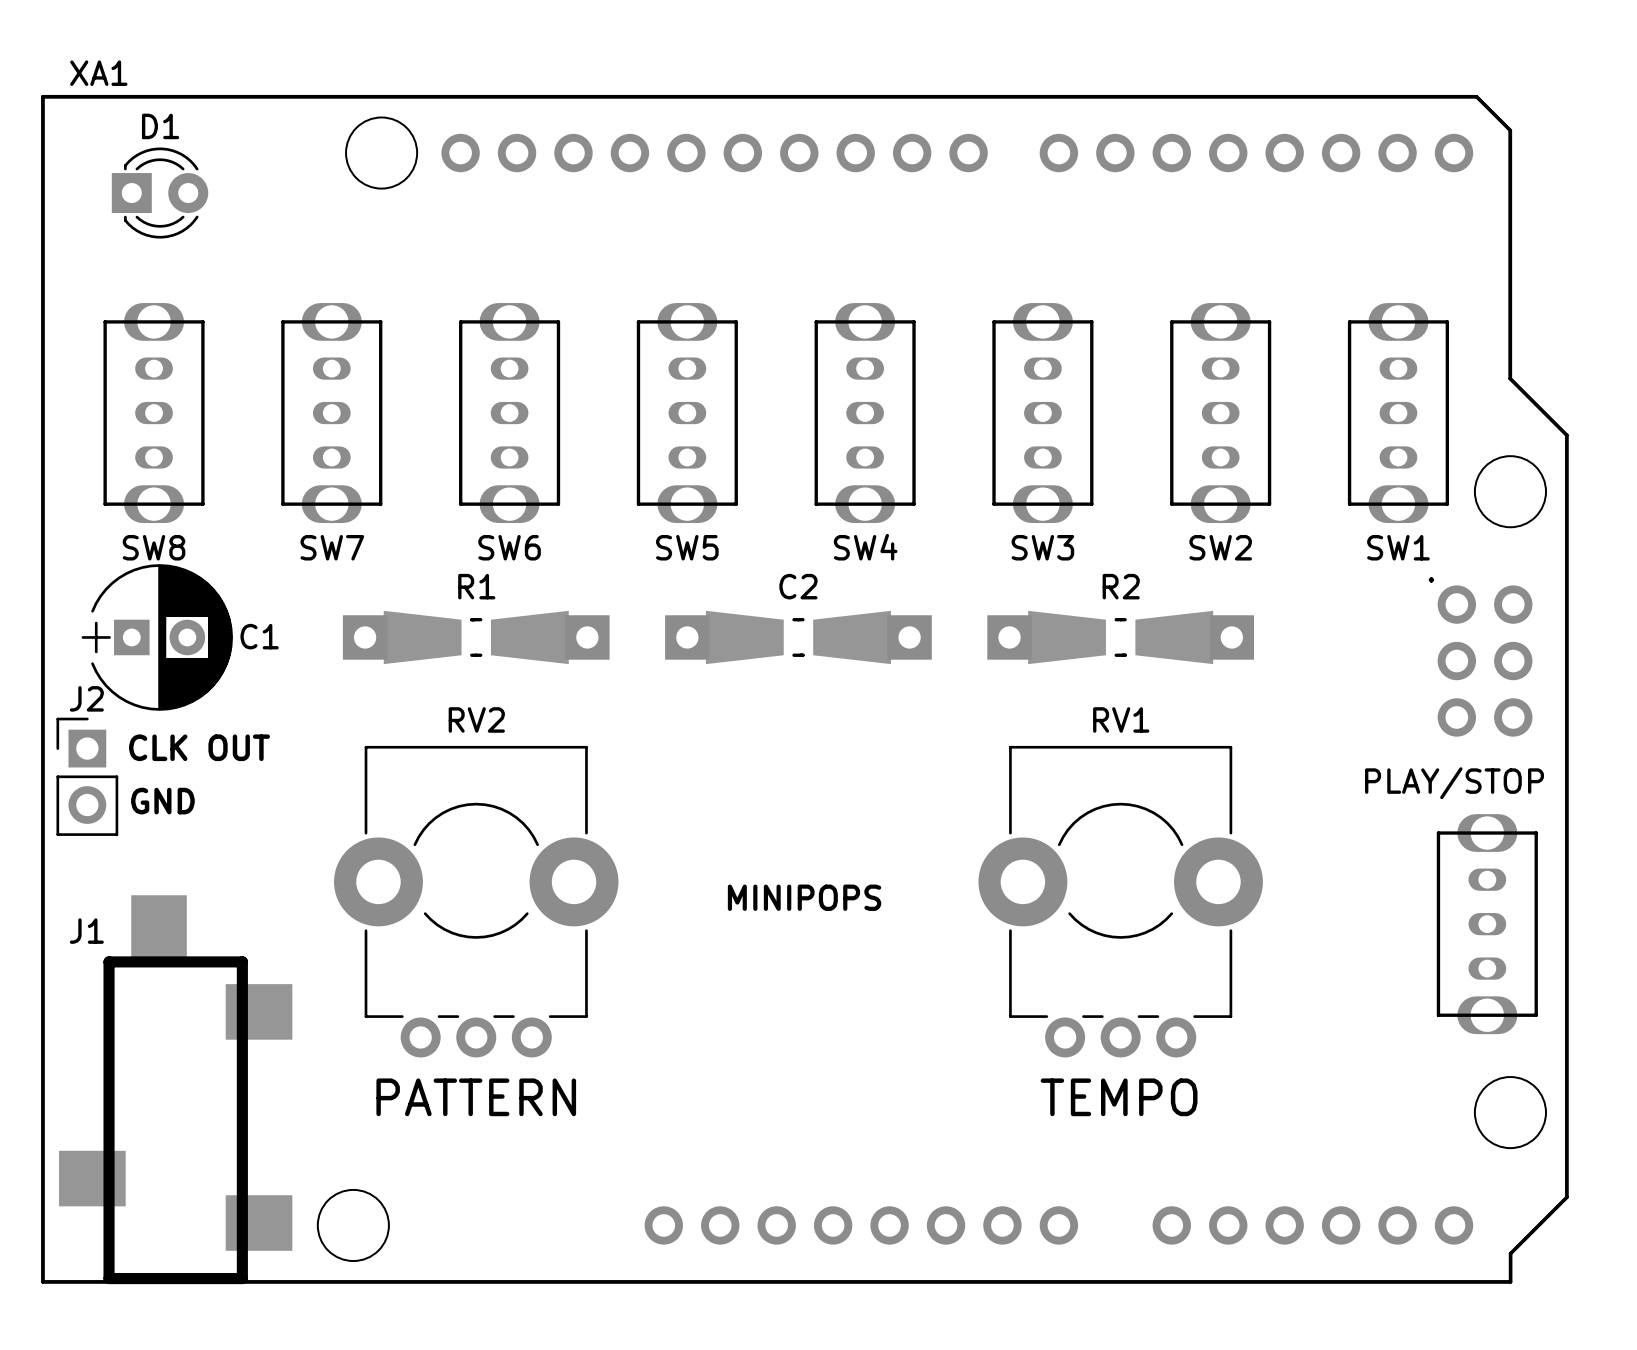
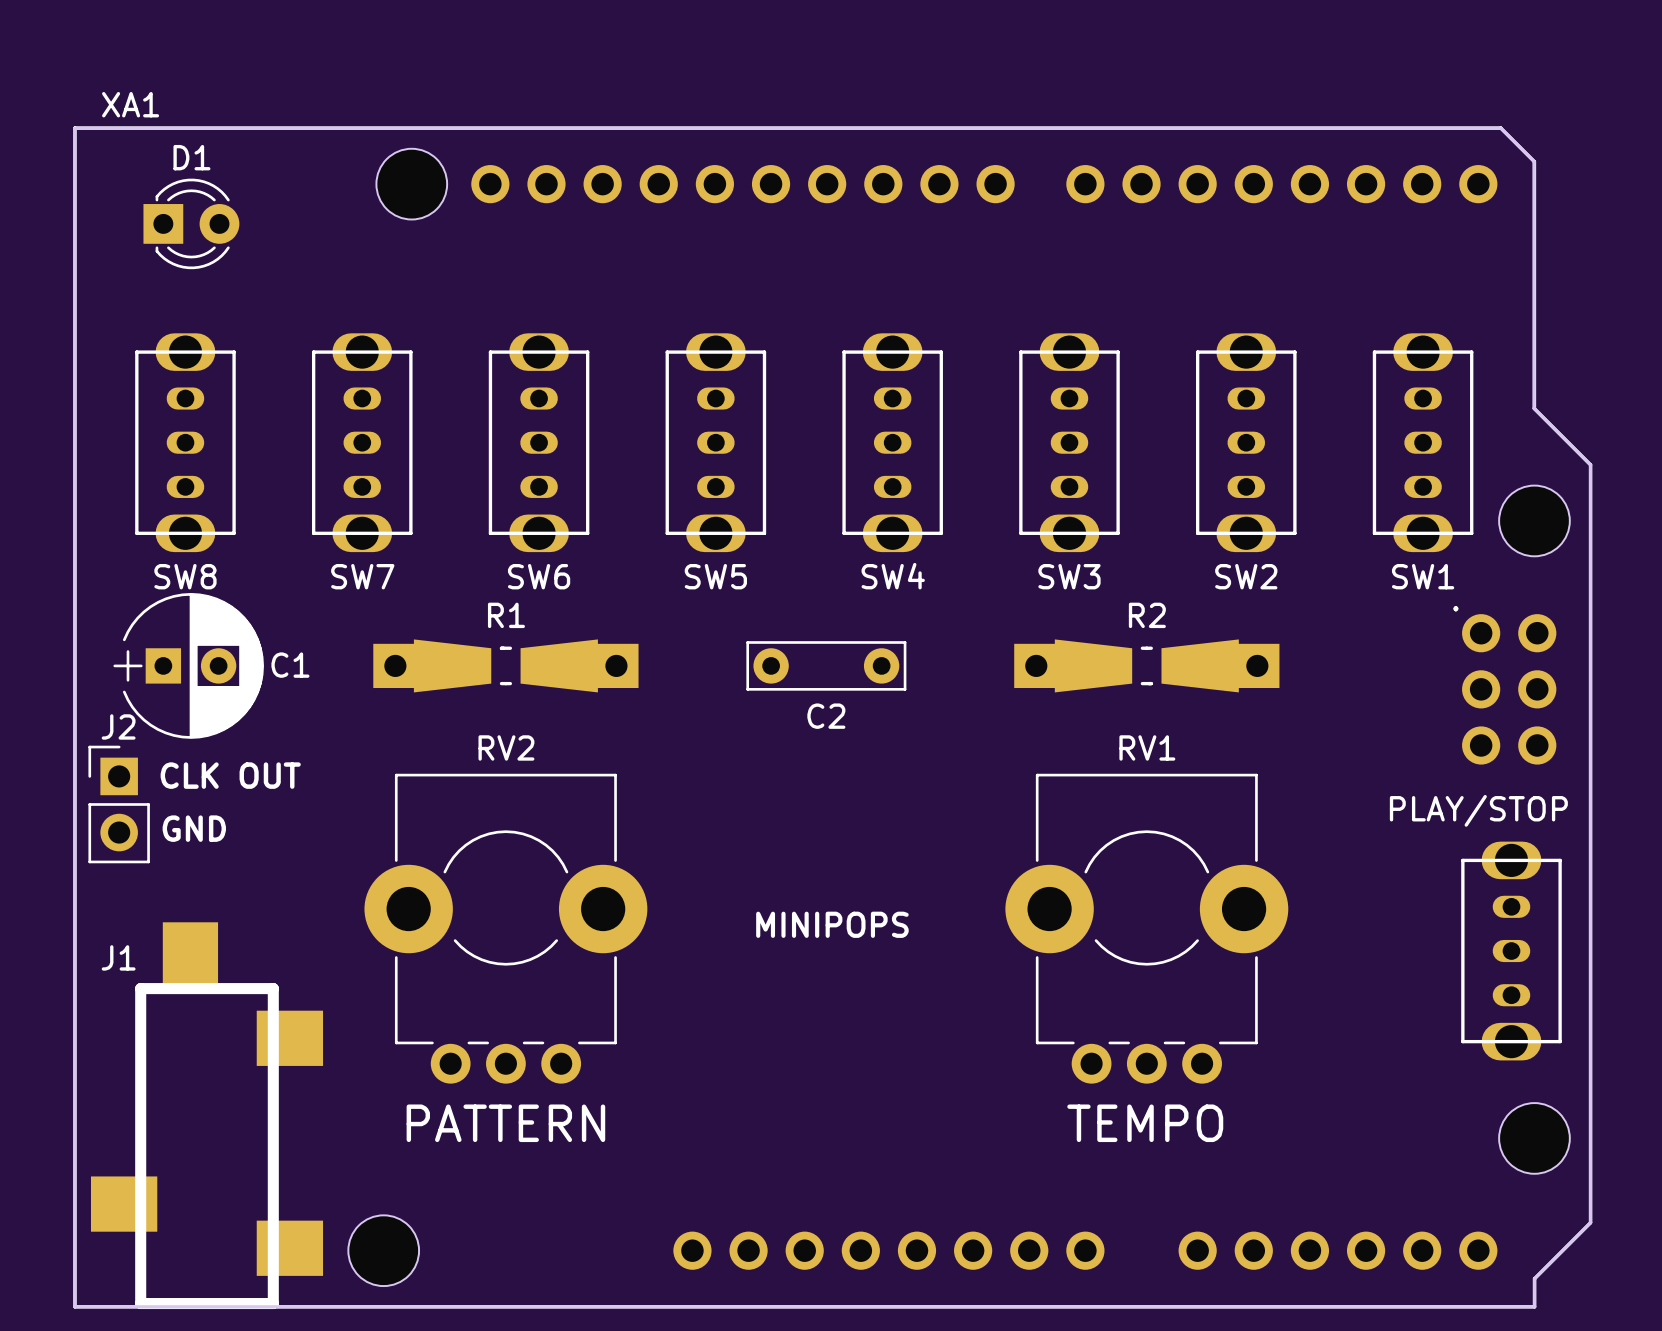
C2 name position: C2 (798, 586) -> C2 (826, 716)
C2 footprint: [665, 610, 932, 665] -> [746, 641, 907, 691]

